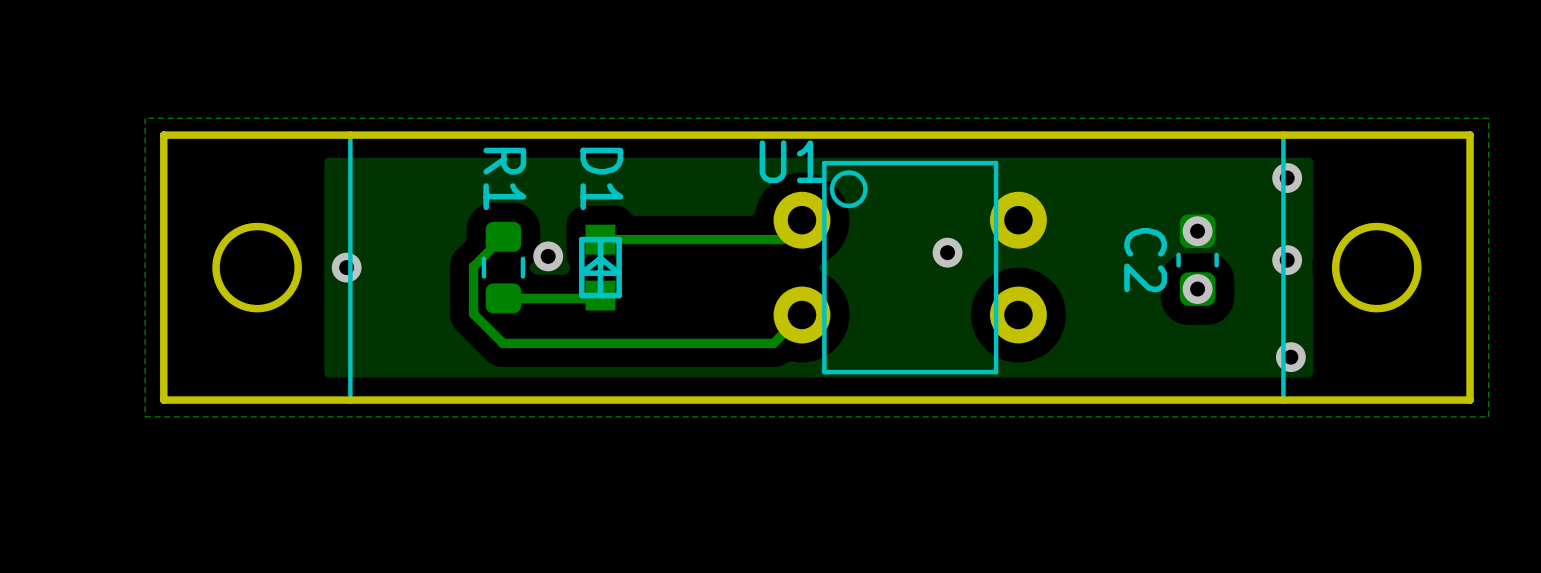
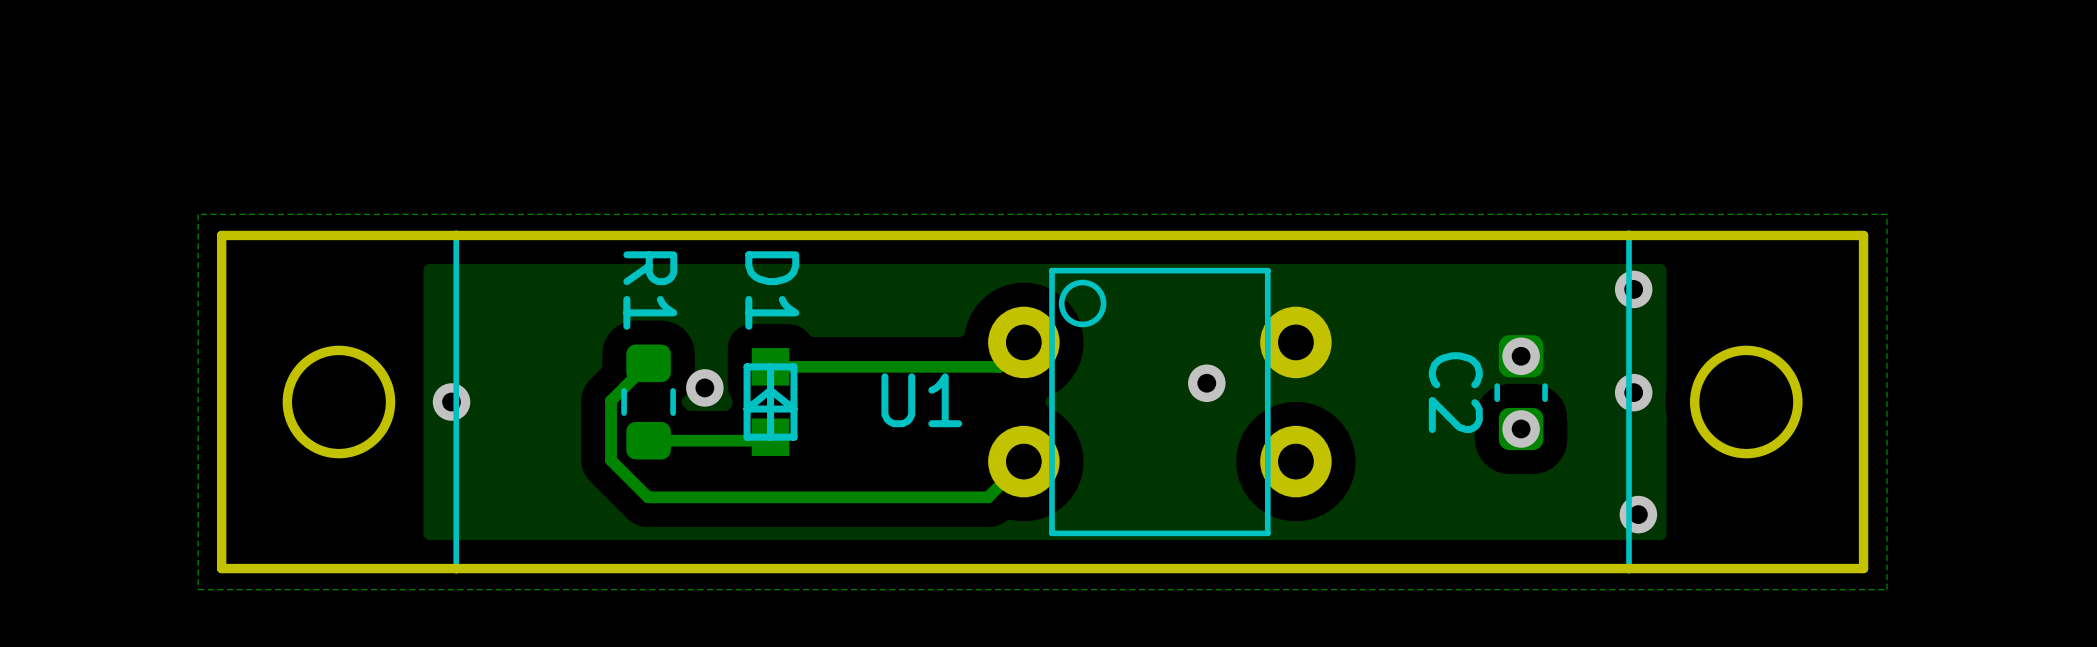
U1 name position: U1 (791, 161) -> U1 (921, 400)

